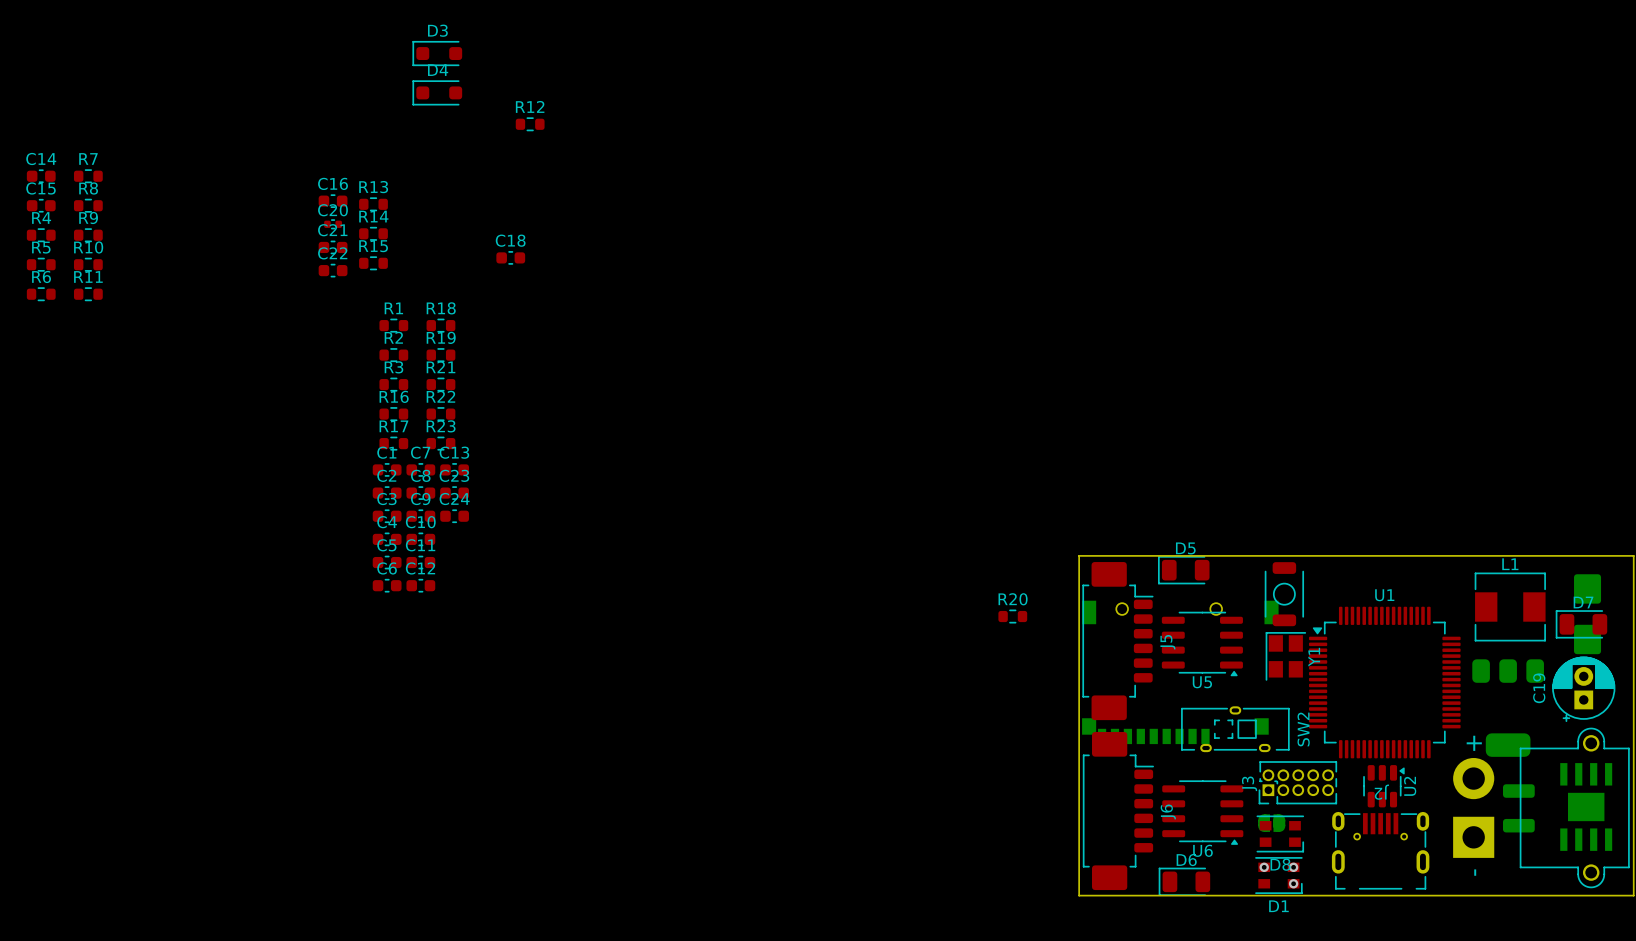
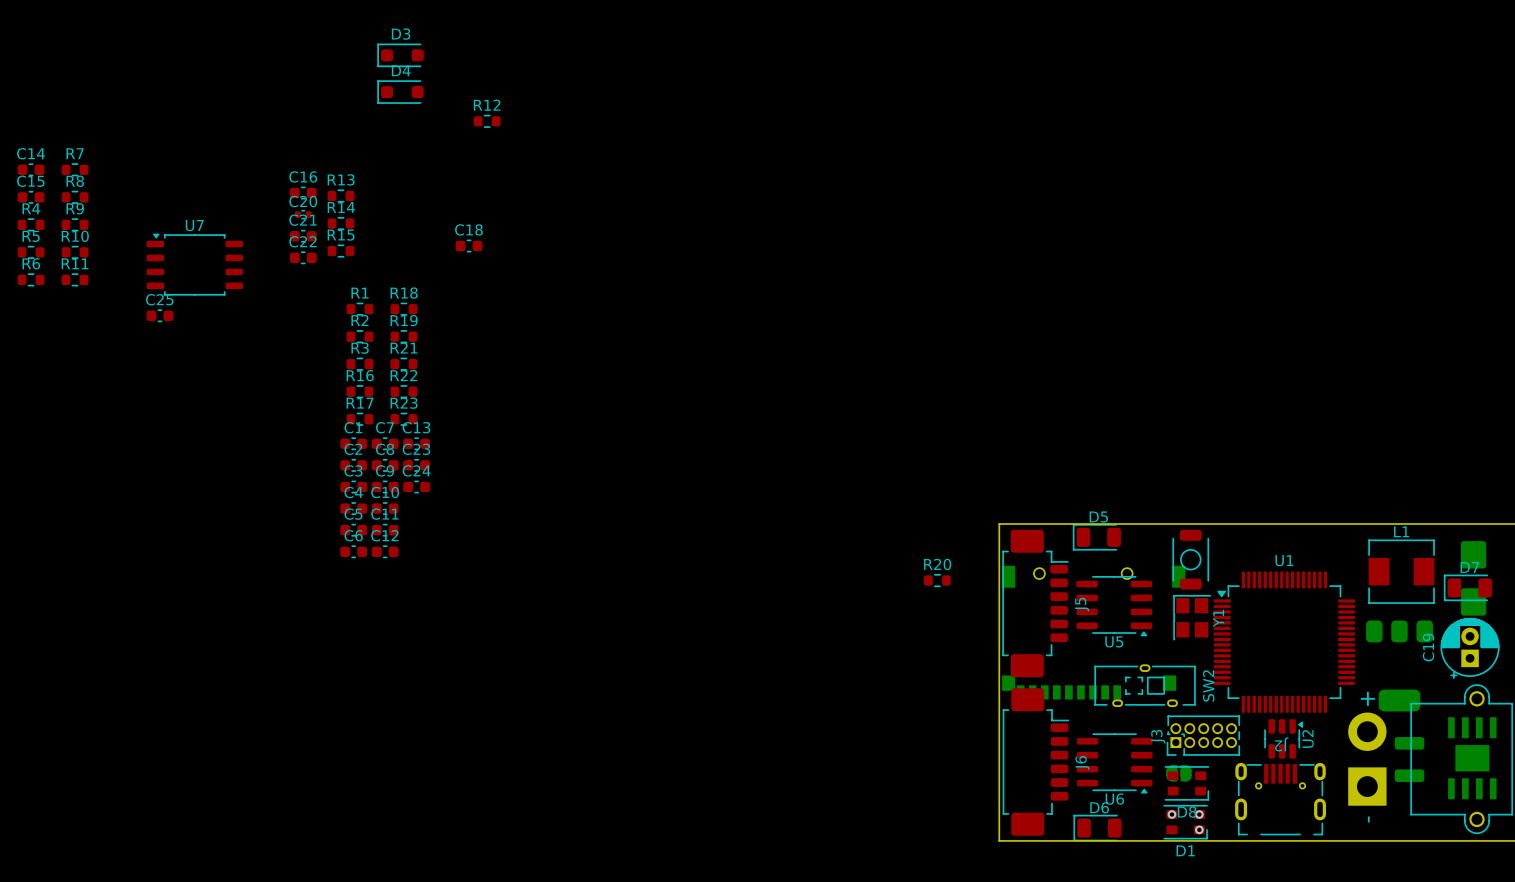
U7: none -> (194, 264)
C25: none -> (159, 315)

